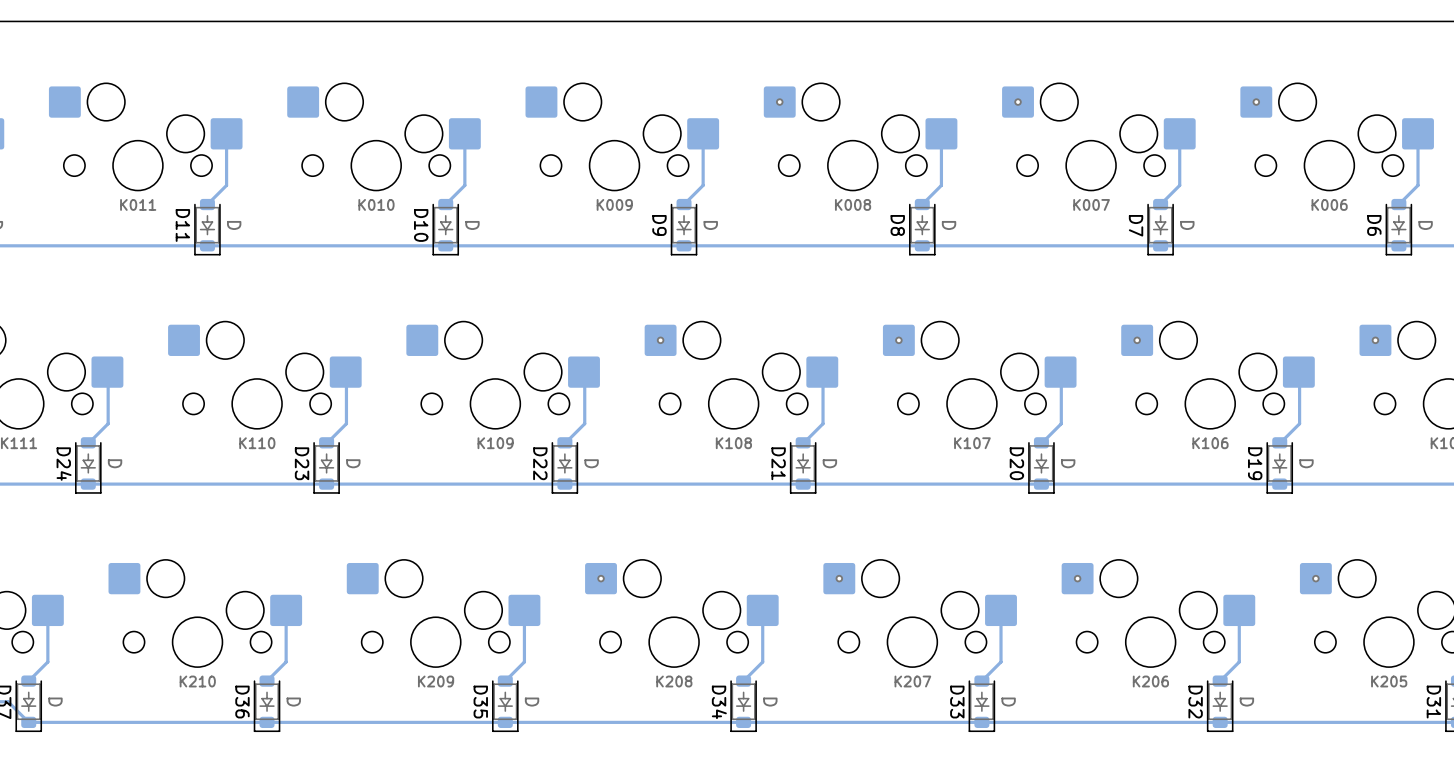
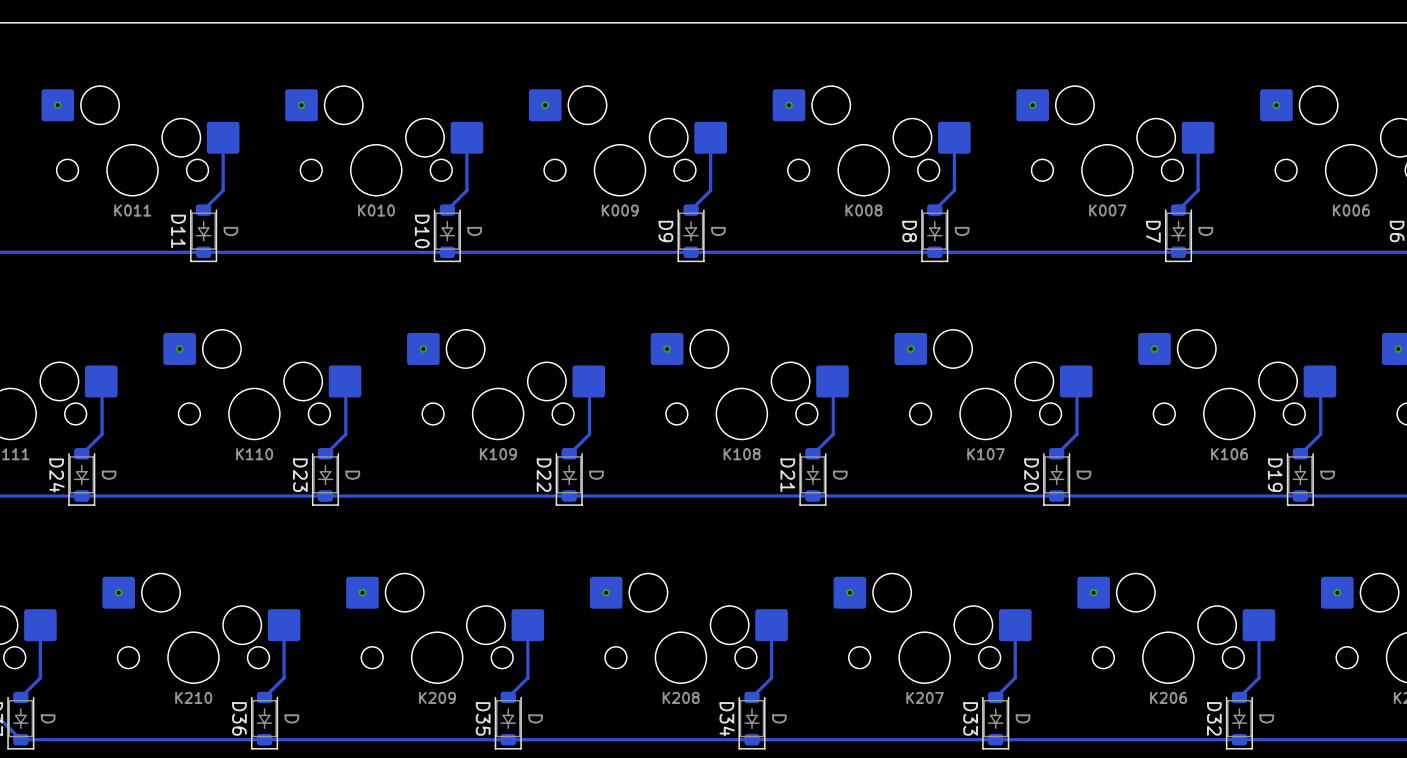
via: none -> (57, 105)
via: none -> (301, 105)
via: none -> (545, 105)
via: none -> (179, 348)
via: none -> (423, 348)
via: none -> (118, 592)
via: none -> (362, 592)

